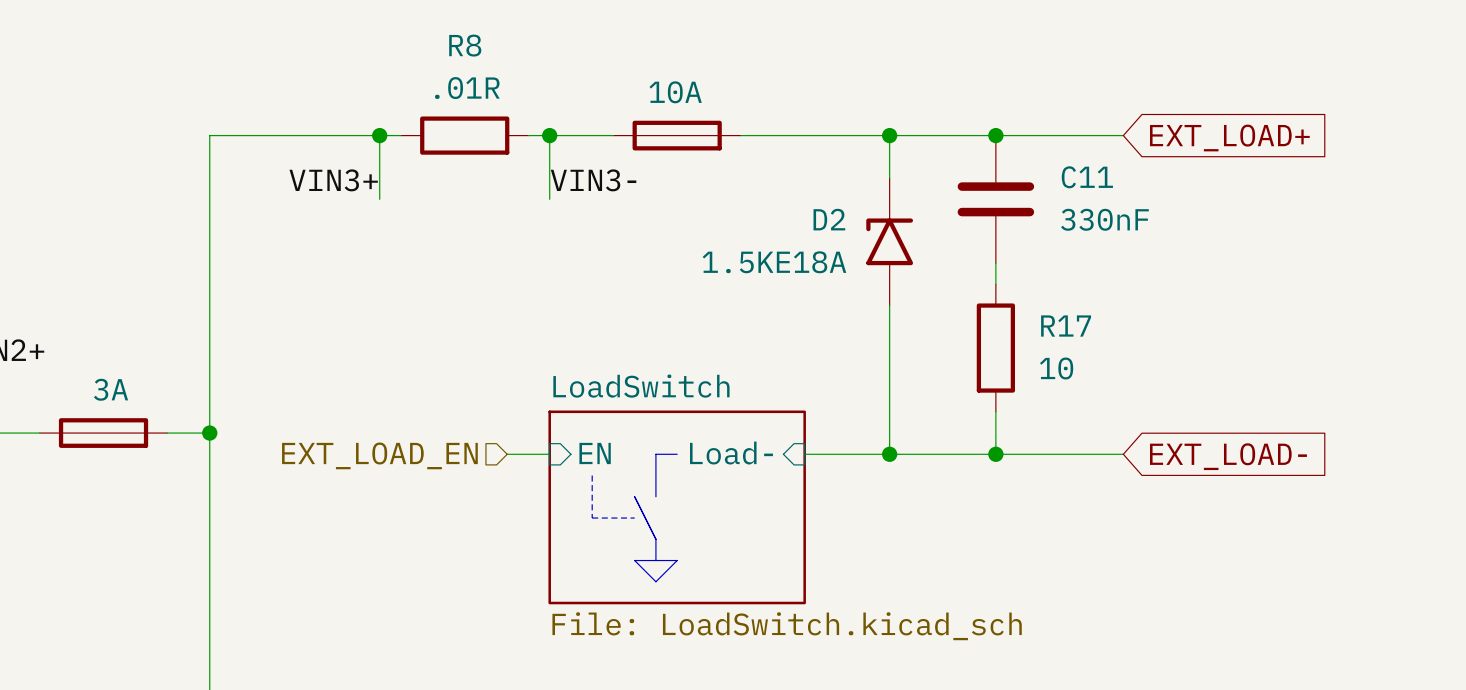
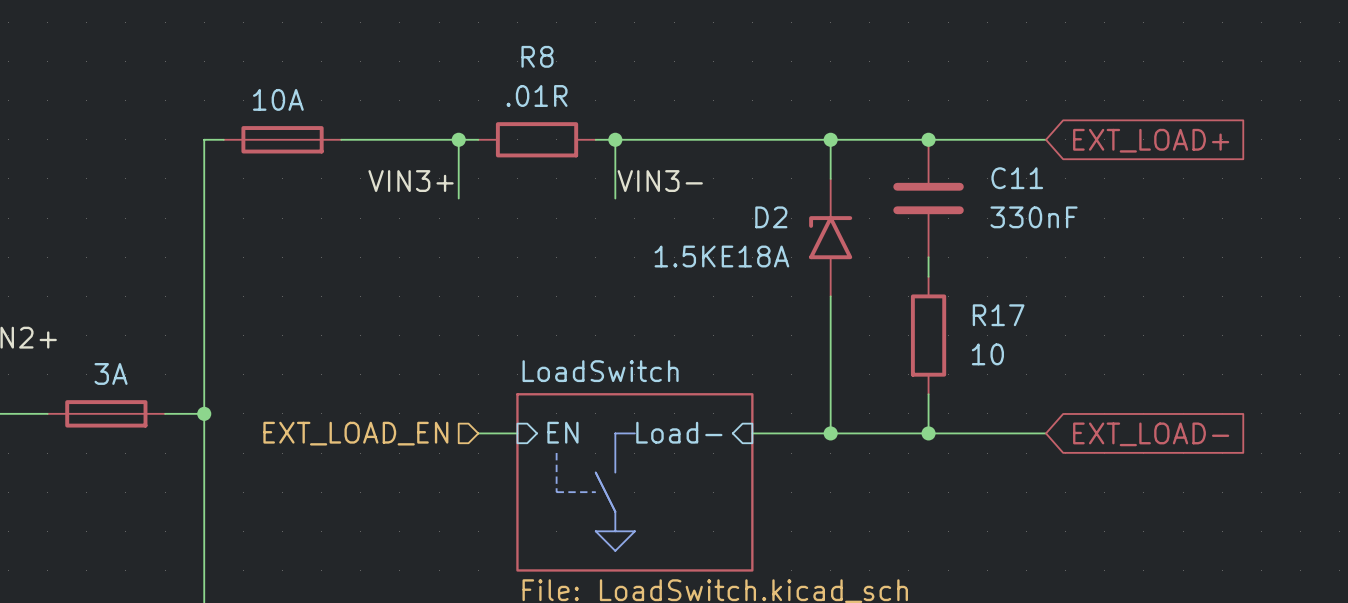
wire: (379, 135) (379, 199) -> (458, 139) (458, 198)
junction: (379, 135) -> none
wire: none -> (380, 139) (478, 139)
R8 position: (464, 135) -> (537, 139)
junction: none -> (458, 139)
wire: (528, 135) (613, 135) -> none
wire: (549, 135) (549, 199) -> (615, 139) (615, 198)
junction: (549, 135) -> none
junction: none -> (615, 139)
part position: (677, 135) -> (282, 139)
label position: VIN3+ (333, 180) -> VIN3+ (411, 181)
label position: VIN3- (593, 180) -> VIN3- (660, 181)

